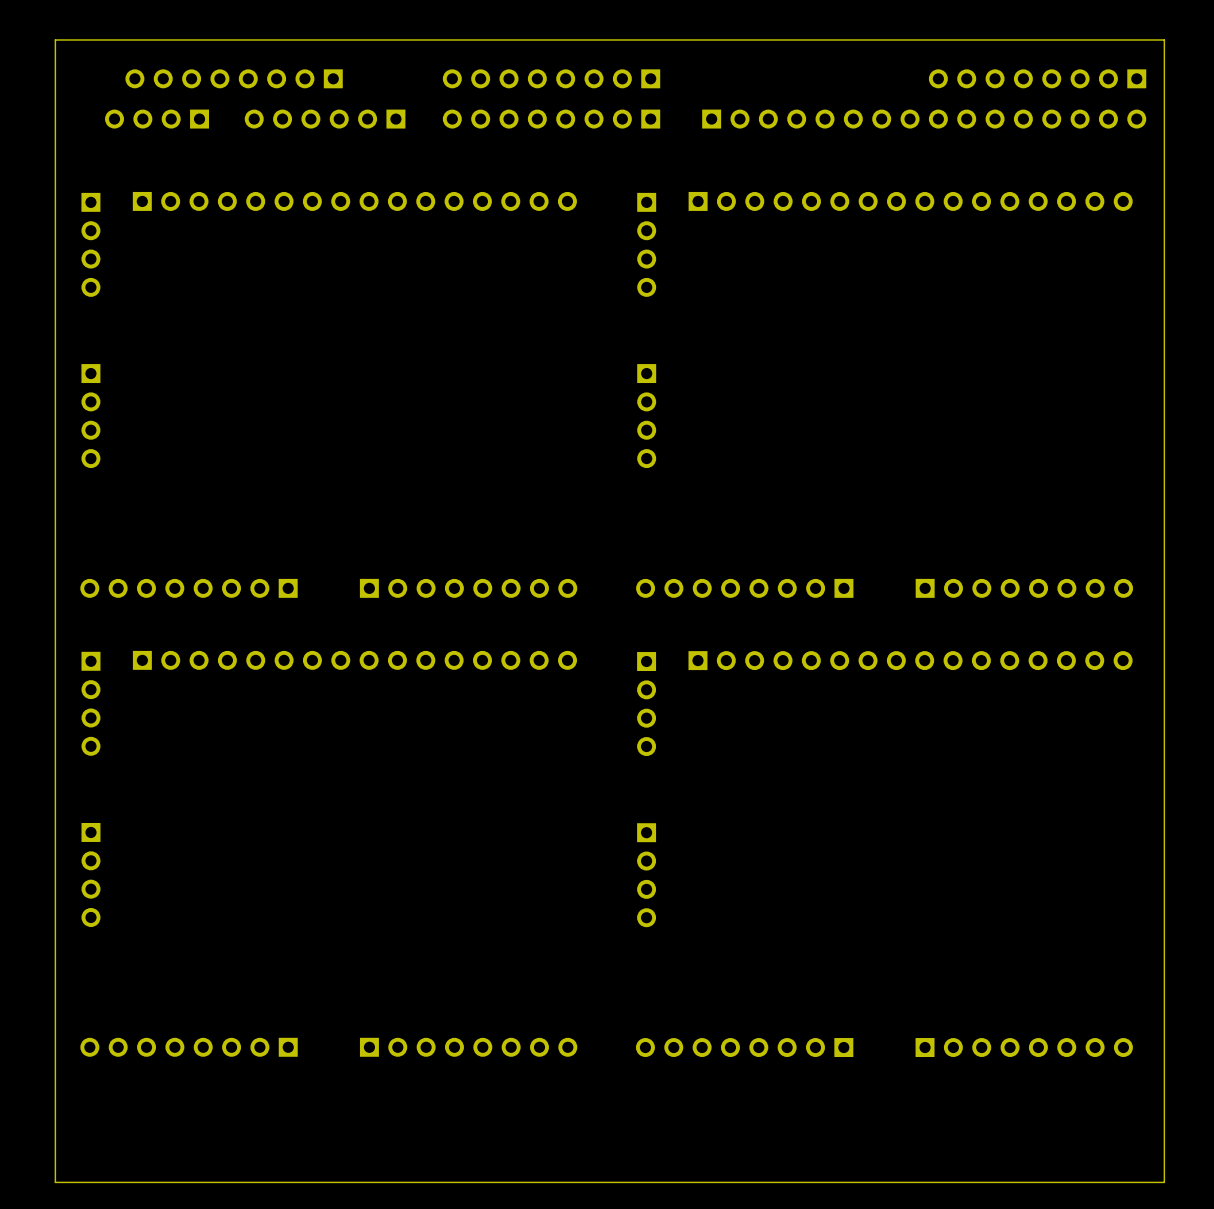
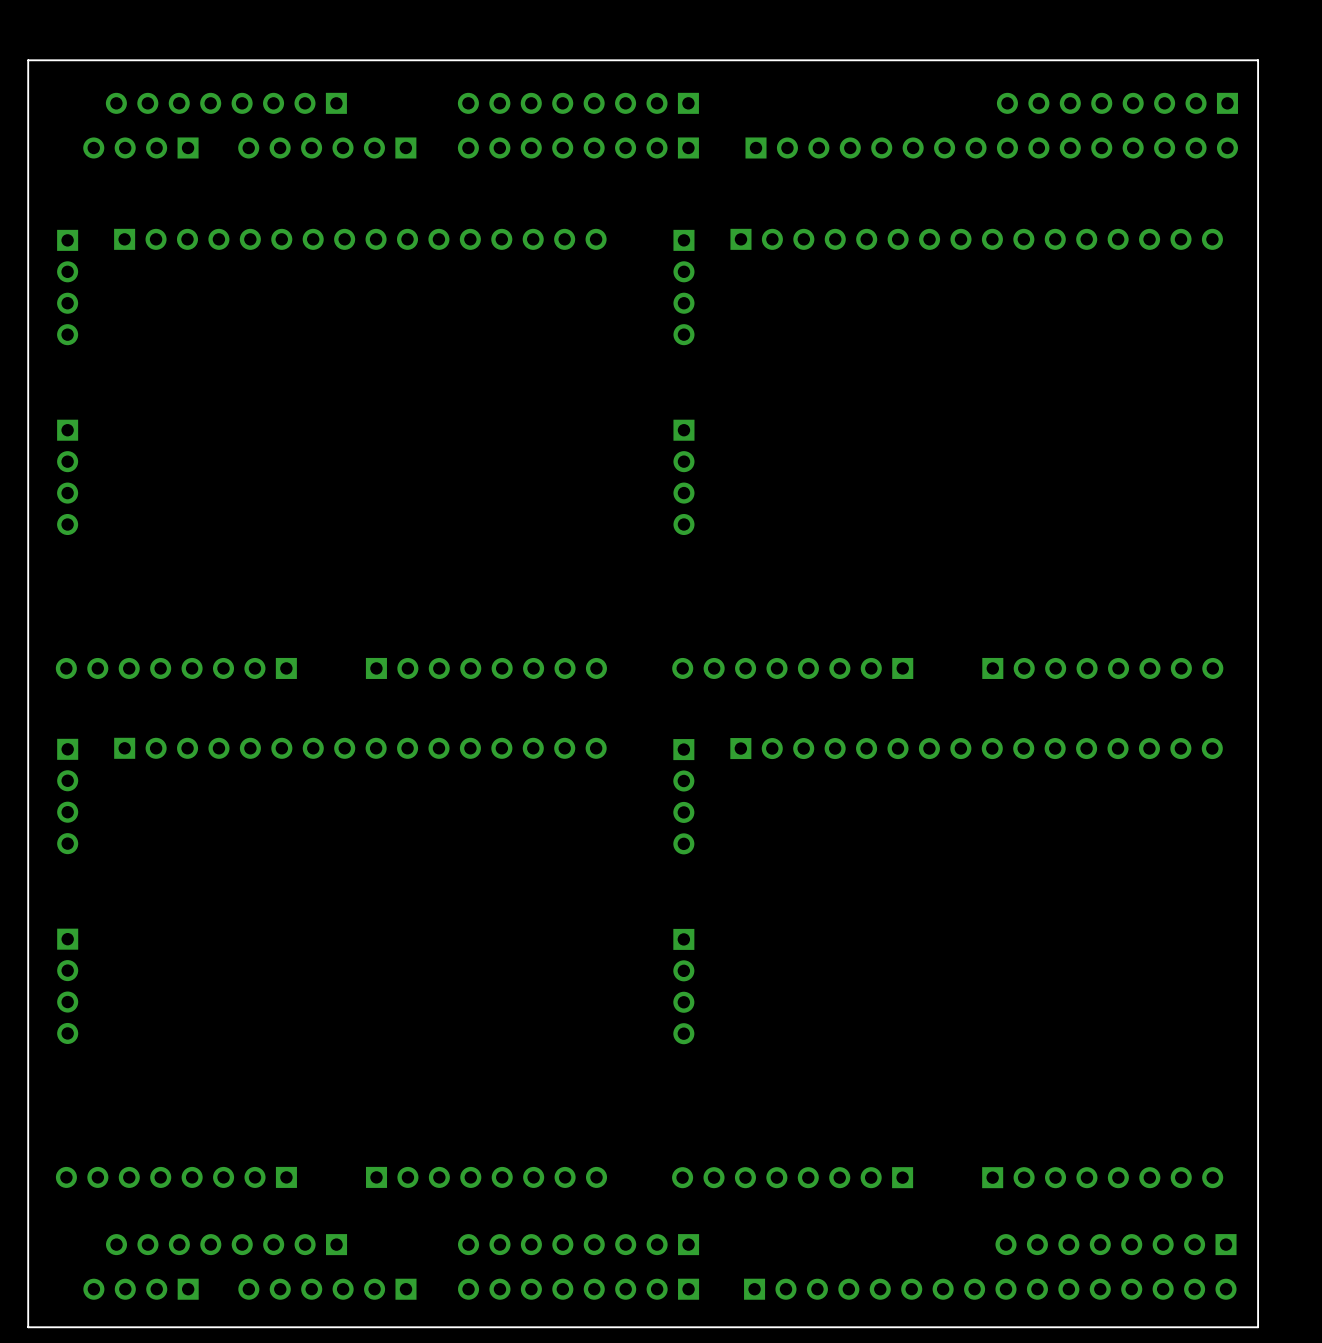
part: none -> (226, 1244)
part: none -> (578, 1244)
part: none -> (1116, 1244)
part: none -> (141, 1289)
part: none -> (327, 1289)
part: none -> (578, 1289)
part: none -> (990, 1289)

